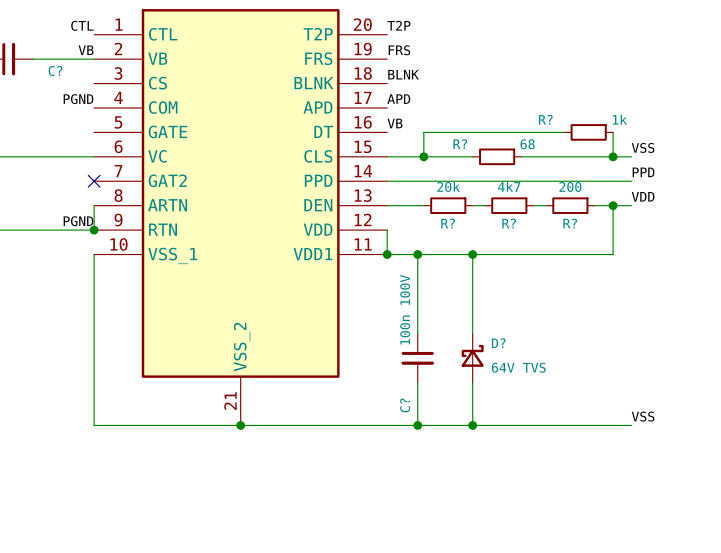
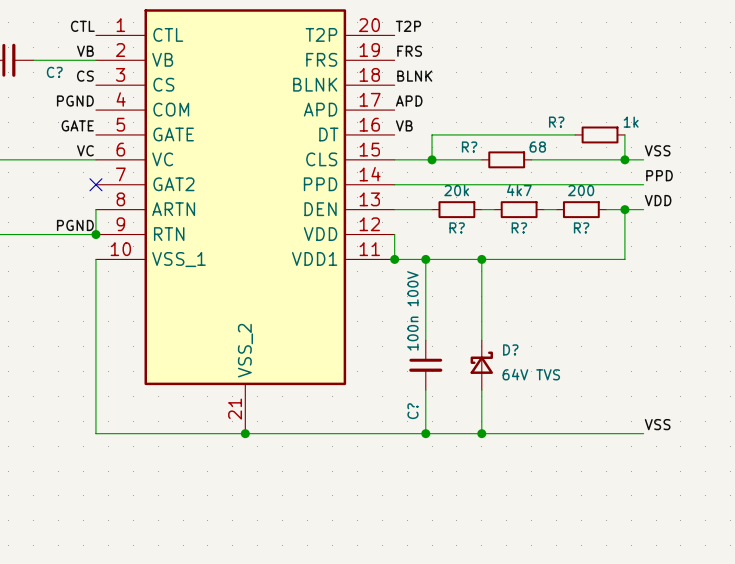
label: none -> CS (85, 76)
label: none -> GATE (77, 125)
label: none -> VC (85, 150)

